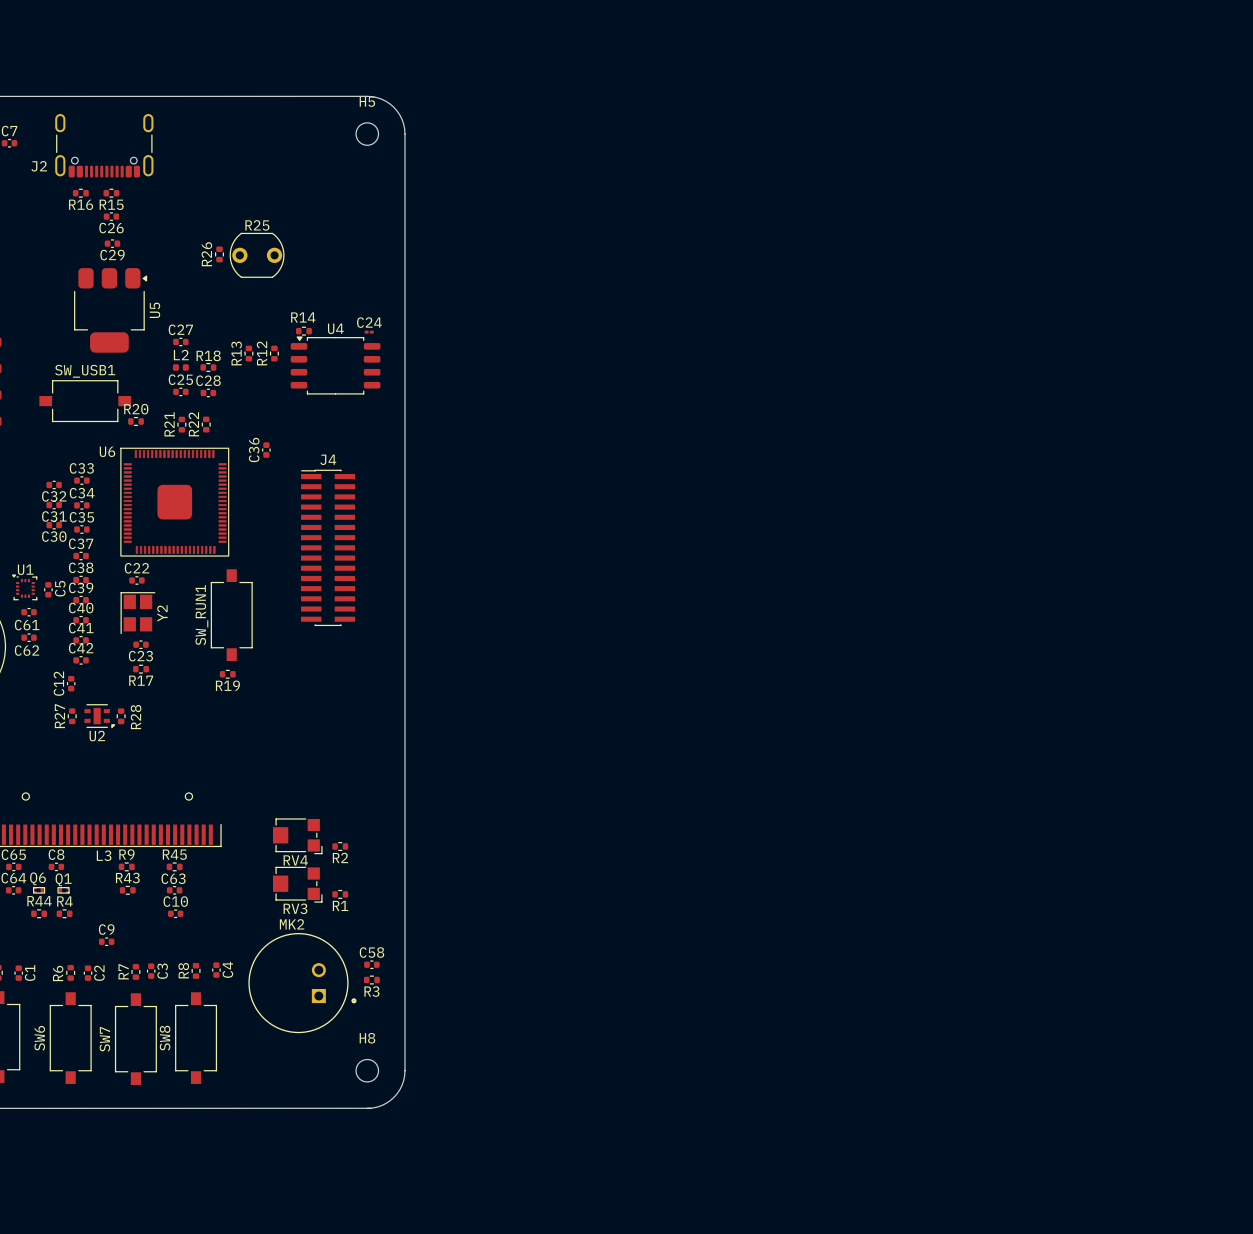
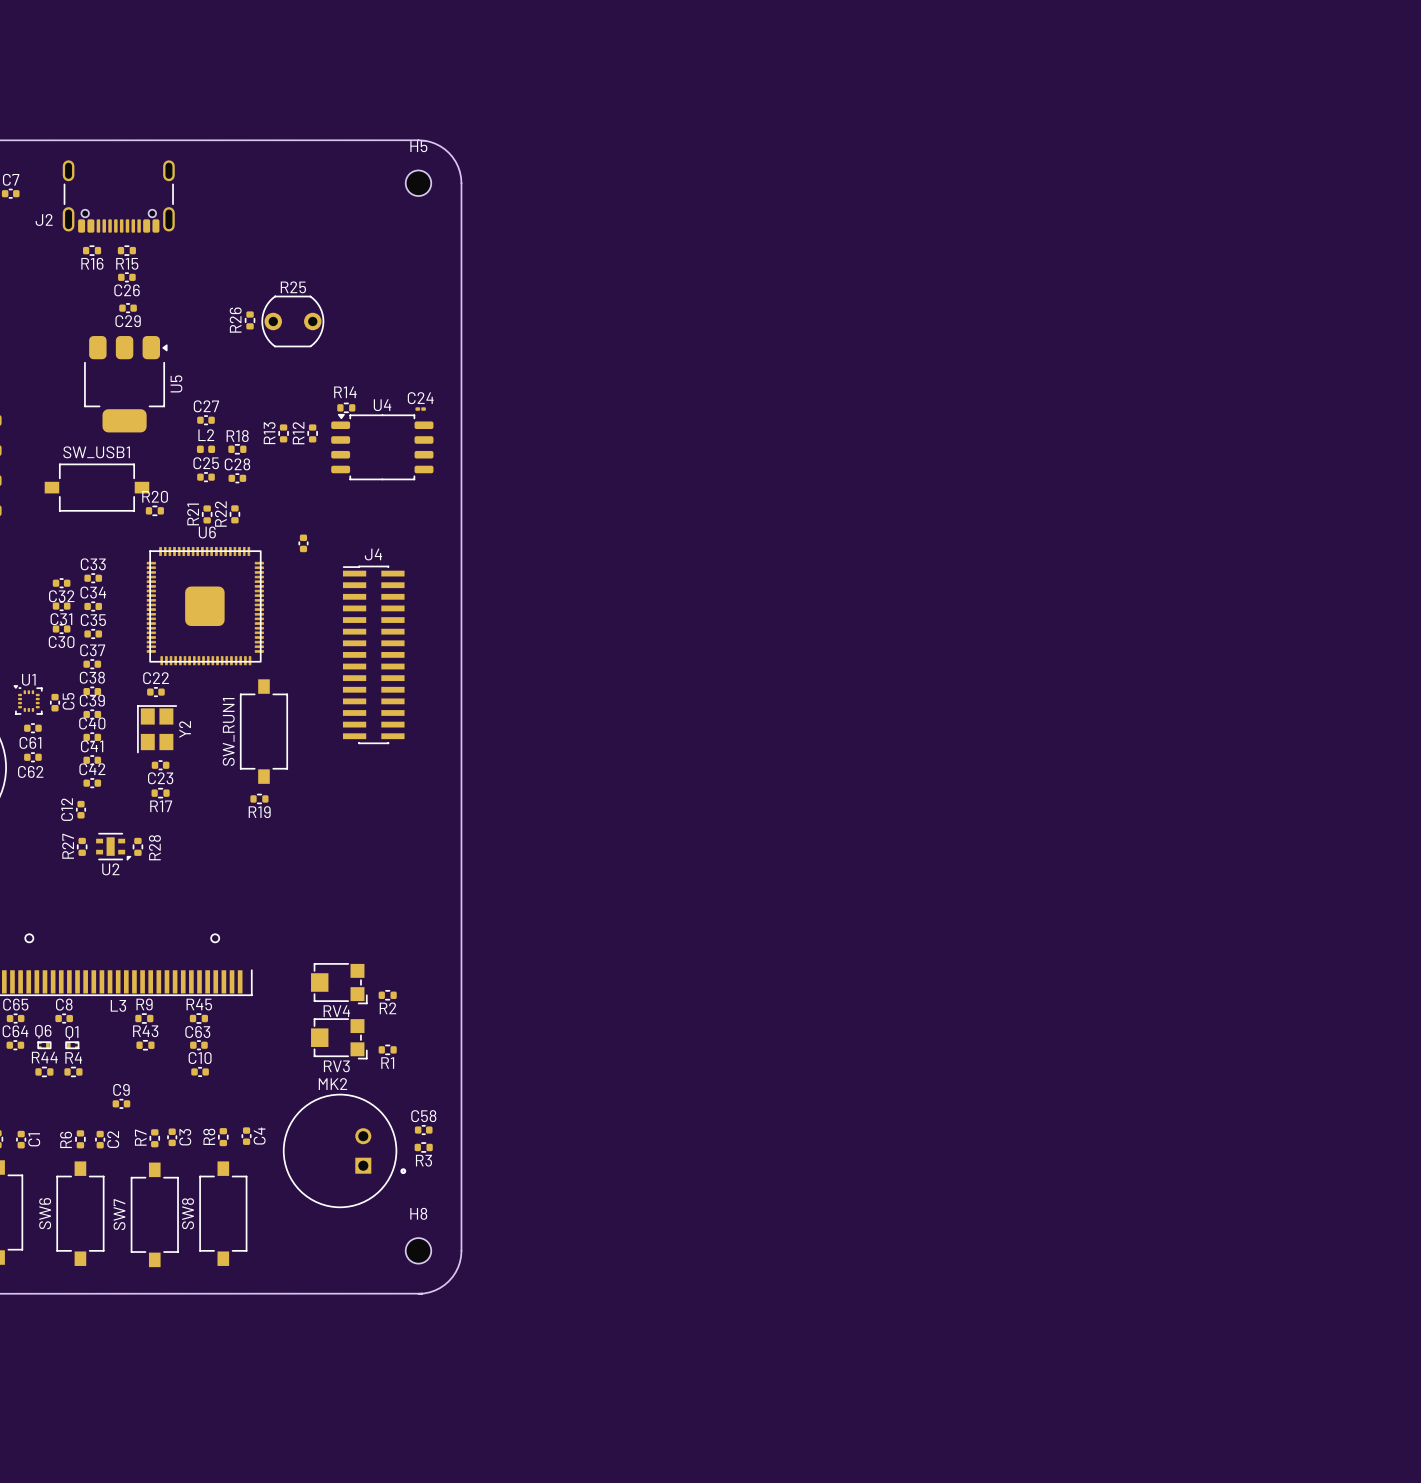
U6 footprint: [120, 447, 230, 557] -> [146, 546, 264, 666]
C36 name: C36 (254, 449) -> none
U6 name position: U6 (107, 451) -> U6 (207, 532)

